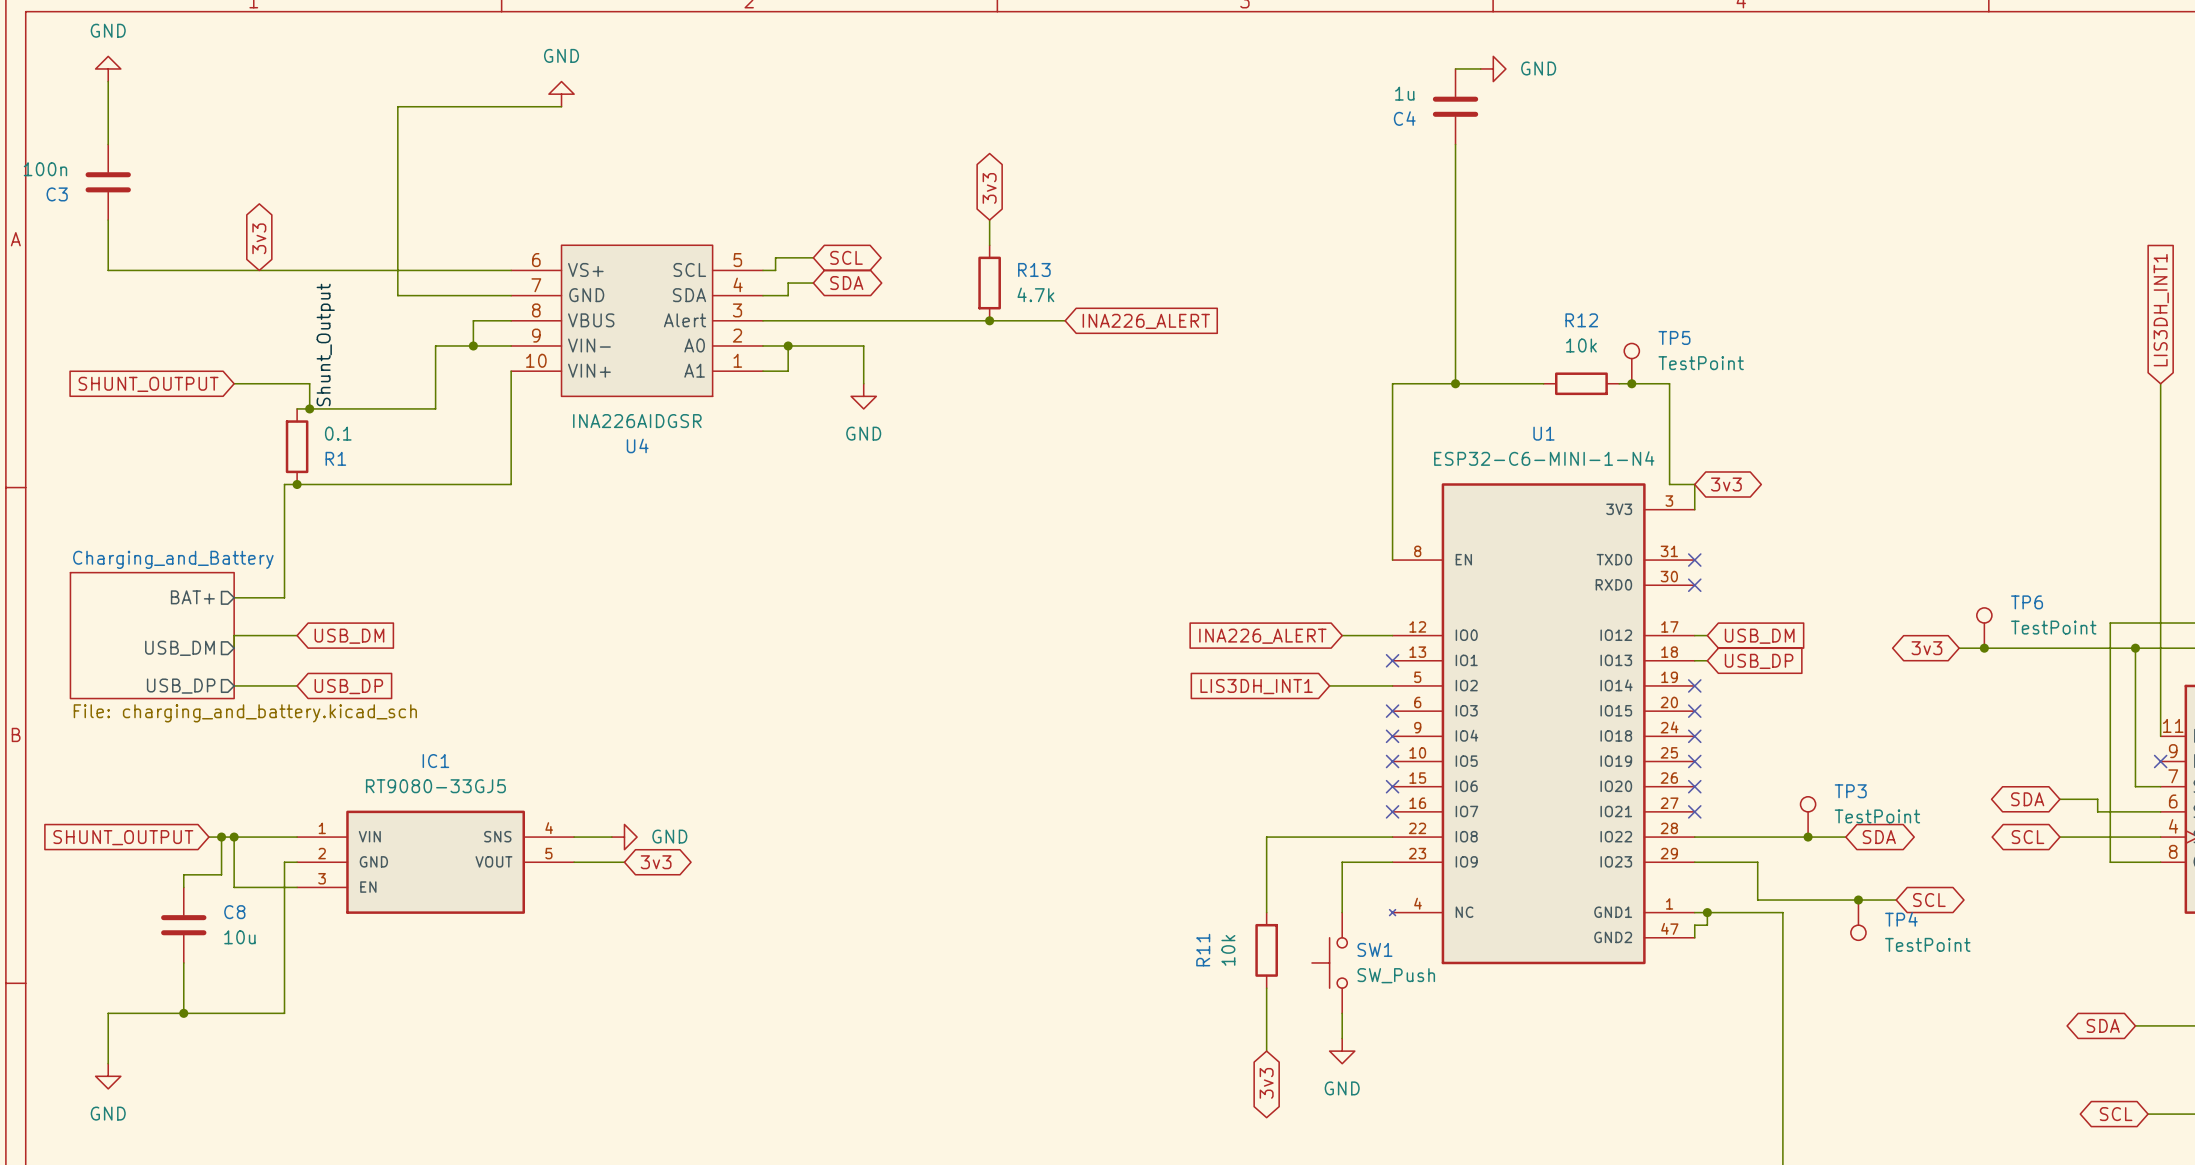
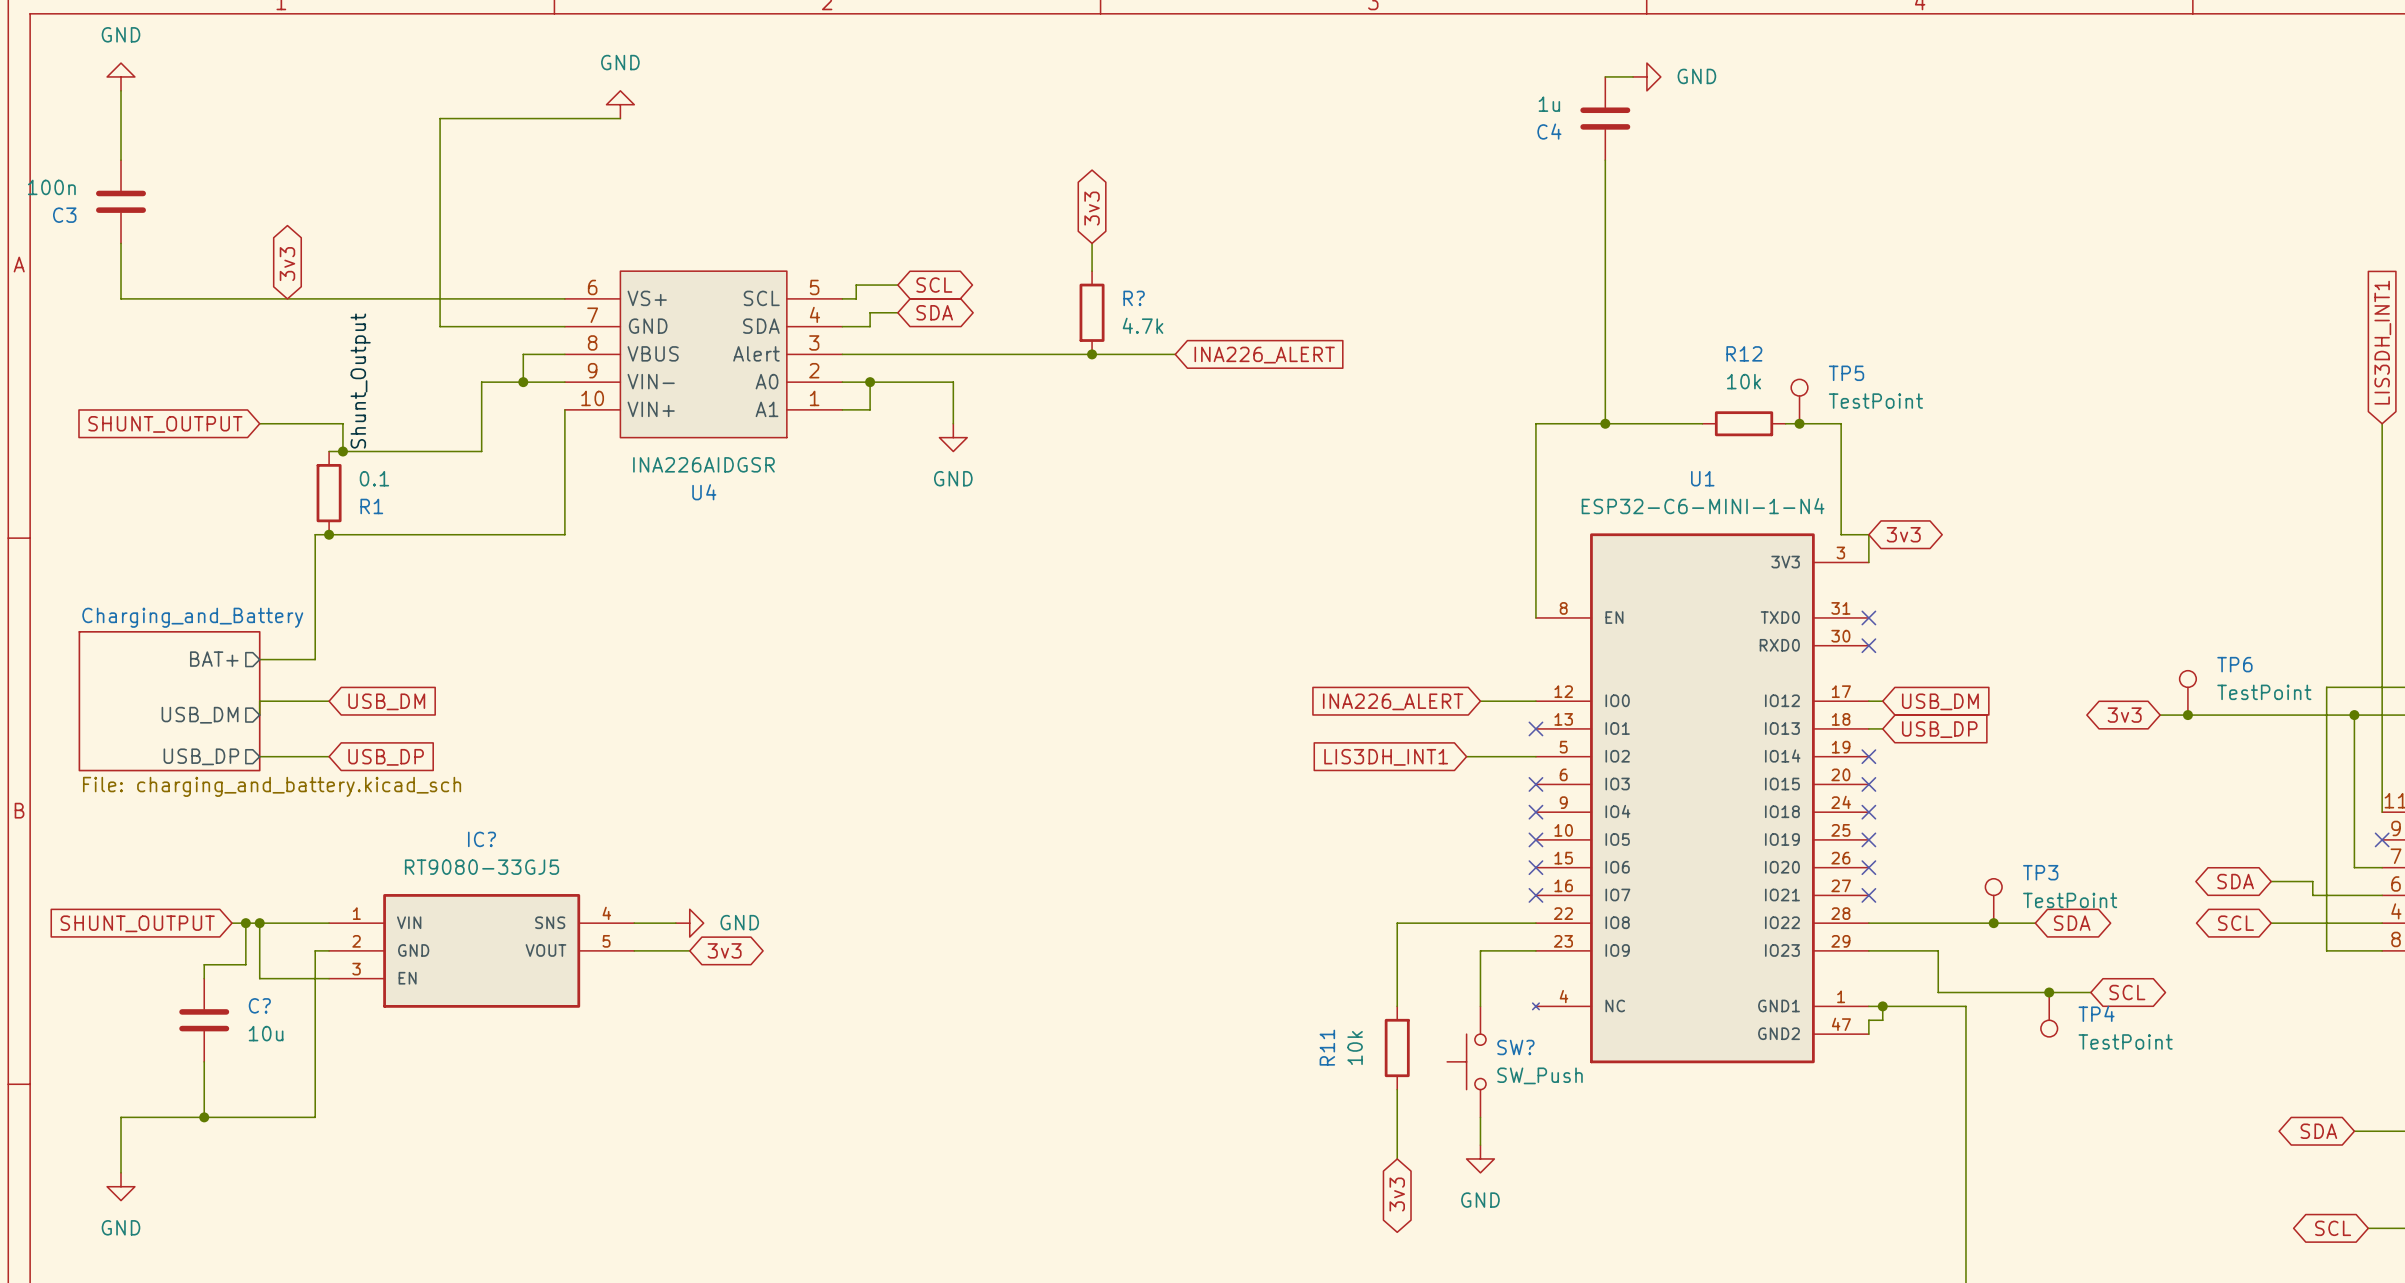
R13 name: R13 (1034, 269) -> R? (1134, 298)
IC1 name: IC1 (435, 761) -> IC? (482, 839)
C8 name: C8 (234, 912) -> C? (259, 1005)
SW1 name: SW1 (1374, 949) -> SW? (1515, 1047)

